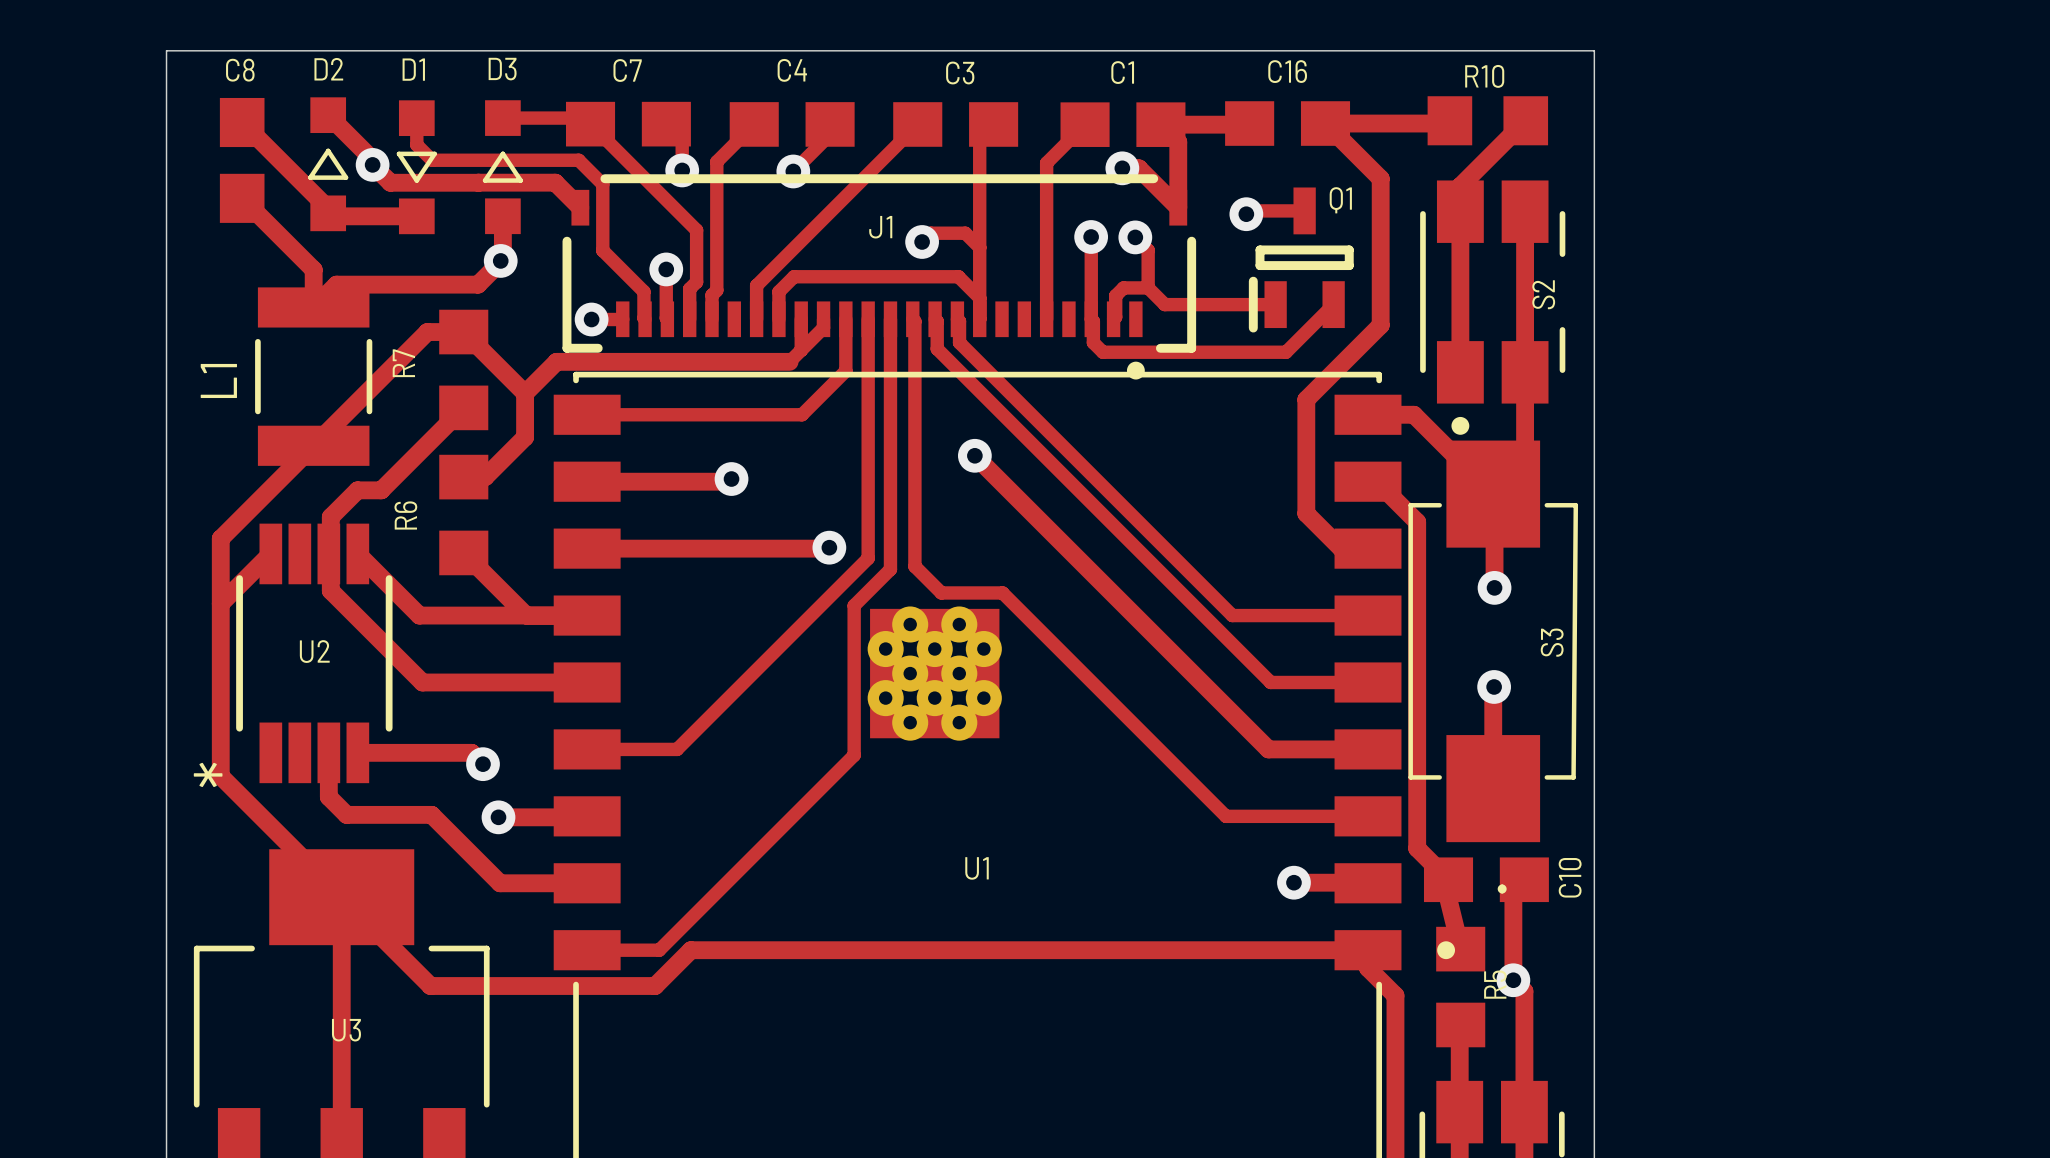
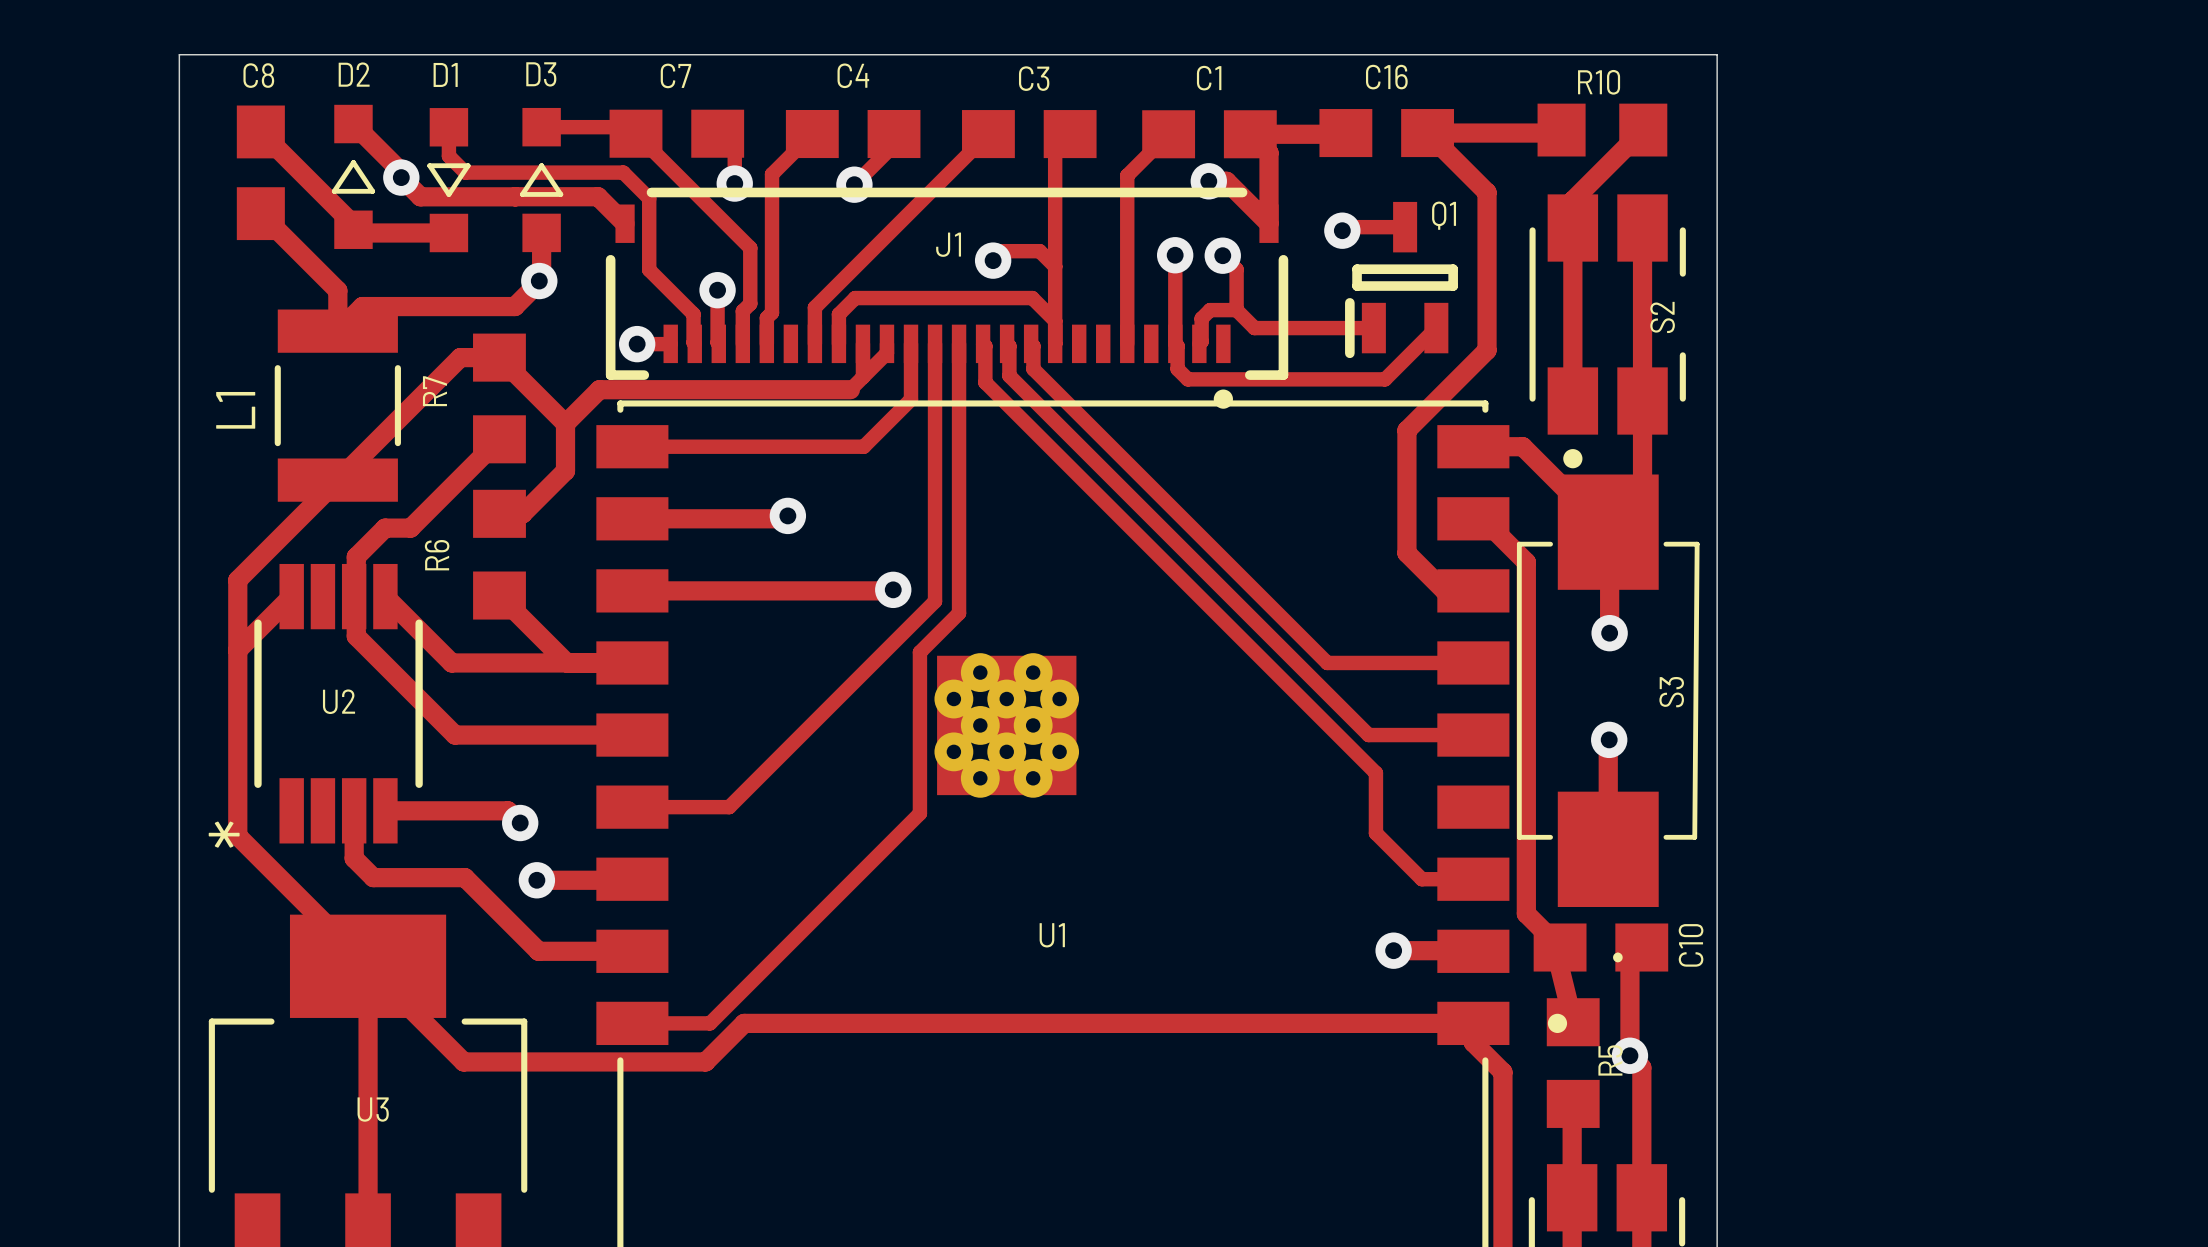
track: (914, 355) (914, 566) (941, 592) (1002, 592) (1226, 816) (1320, 816) -> (985, 382) (1375, 773) (1375, 833) (1421, 879)
track: (974, 455) (1268, 749) (1368, 749) -> none
via: (974, 455) -> none

